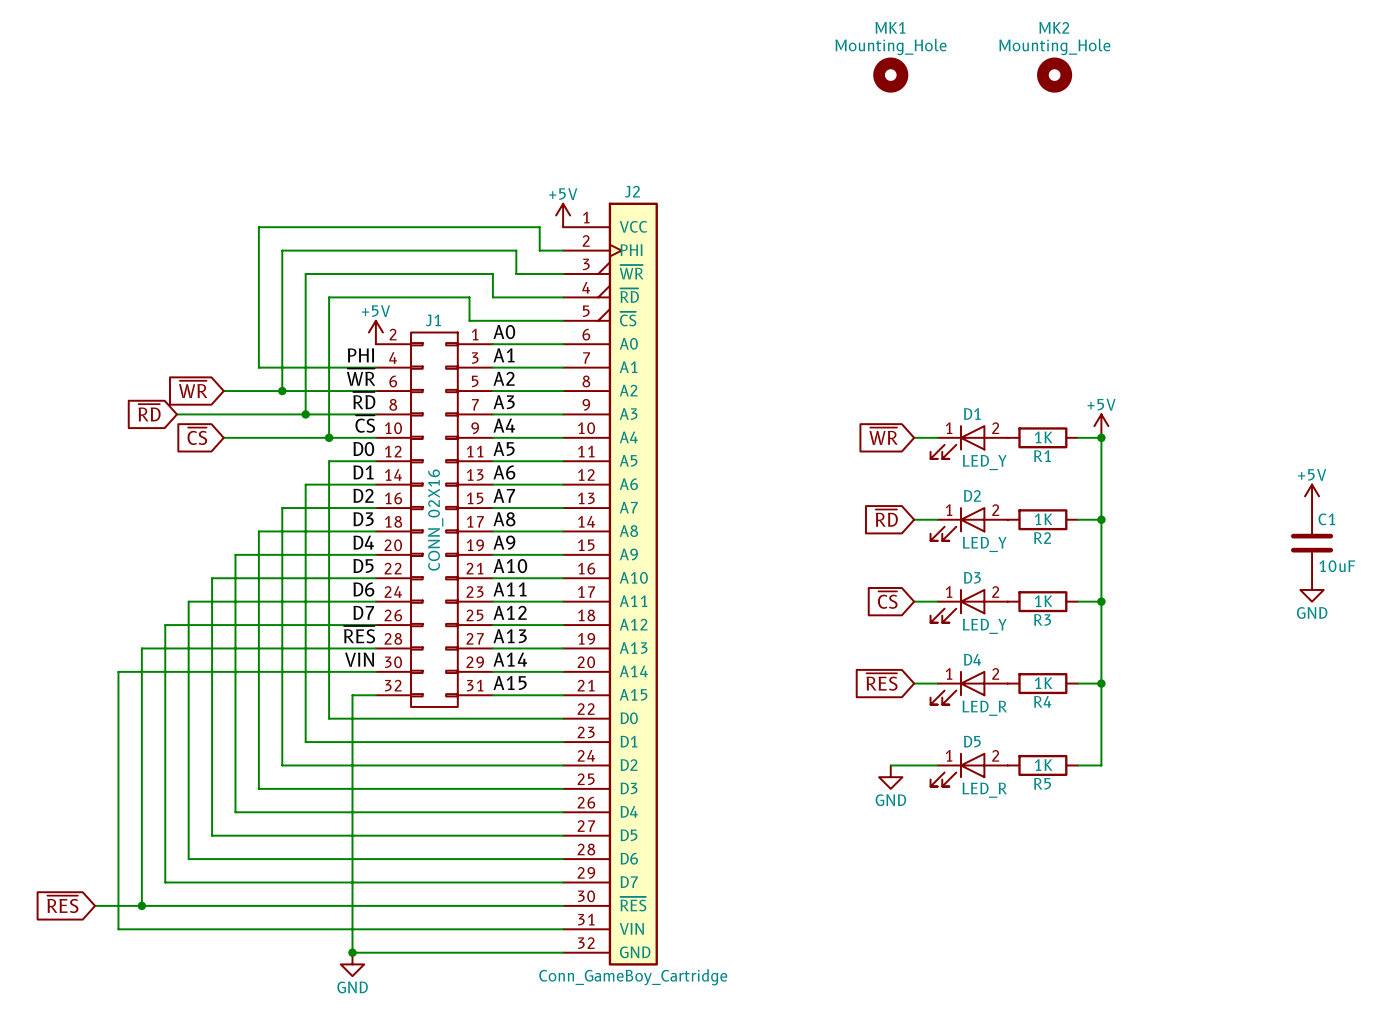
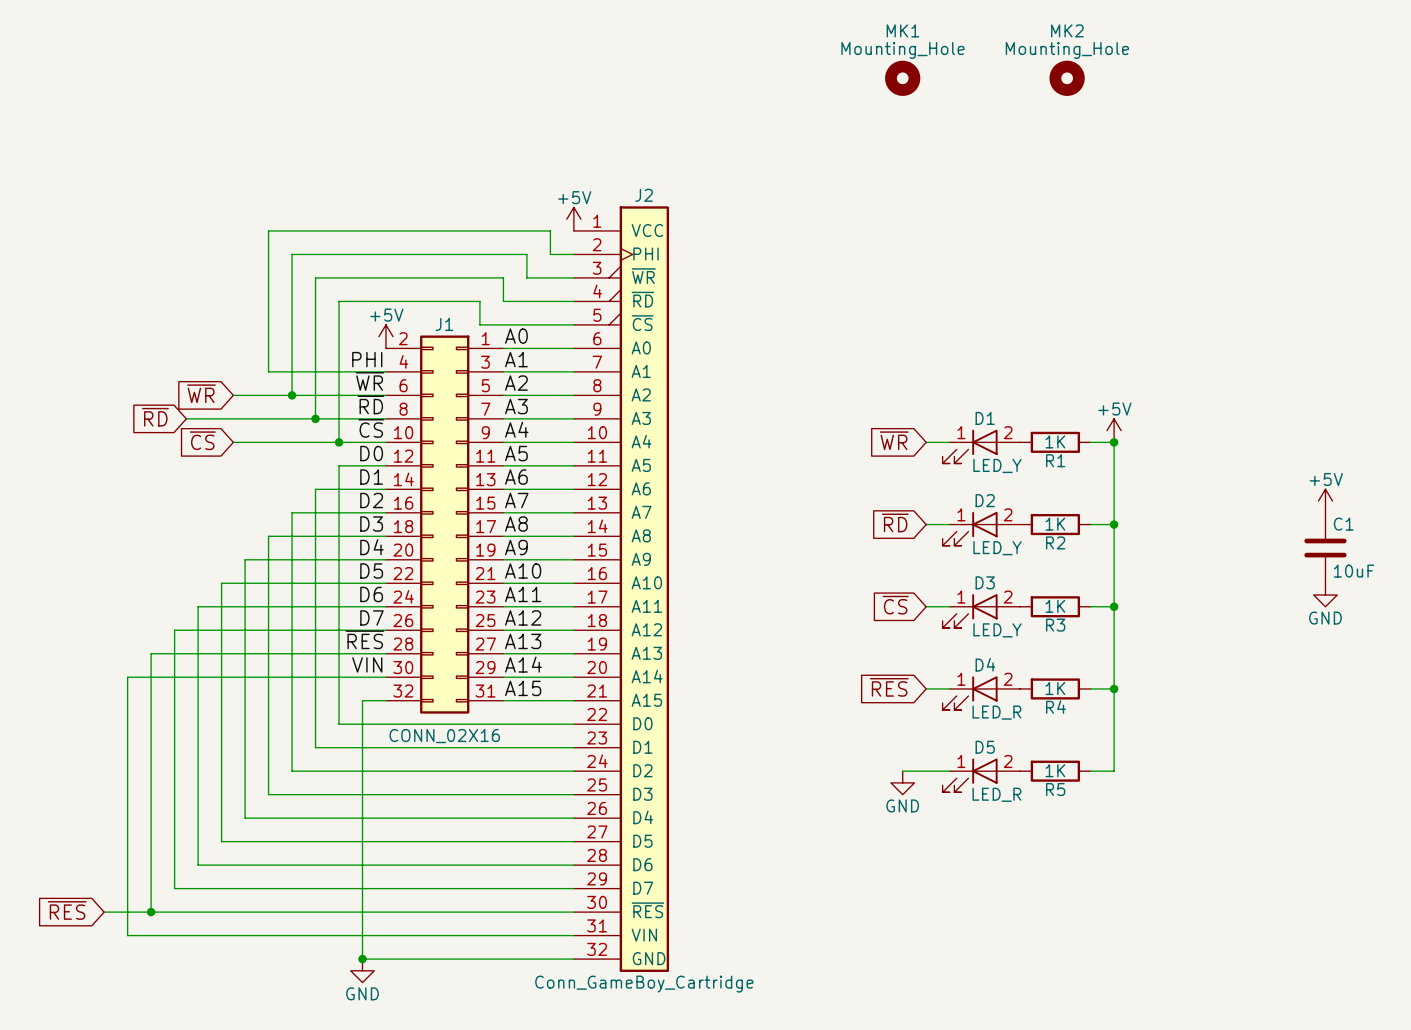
J1 symbol: [375, 332, 493, 707] -> [385, 335, 504, 714]
J1 value position: CONN_02X16 (435, 520) -> CONN_02X16 (444, 736)

